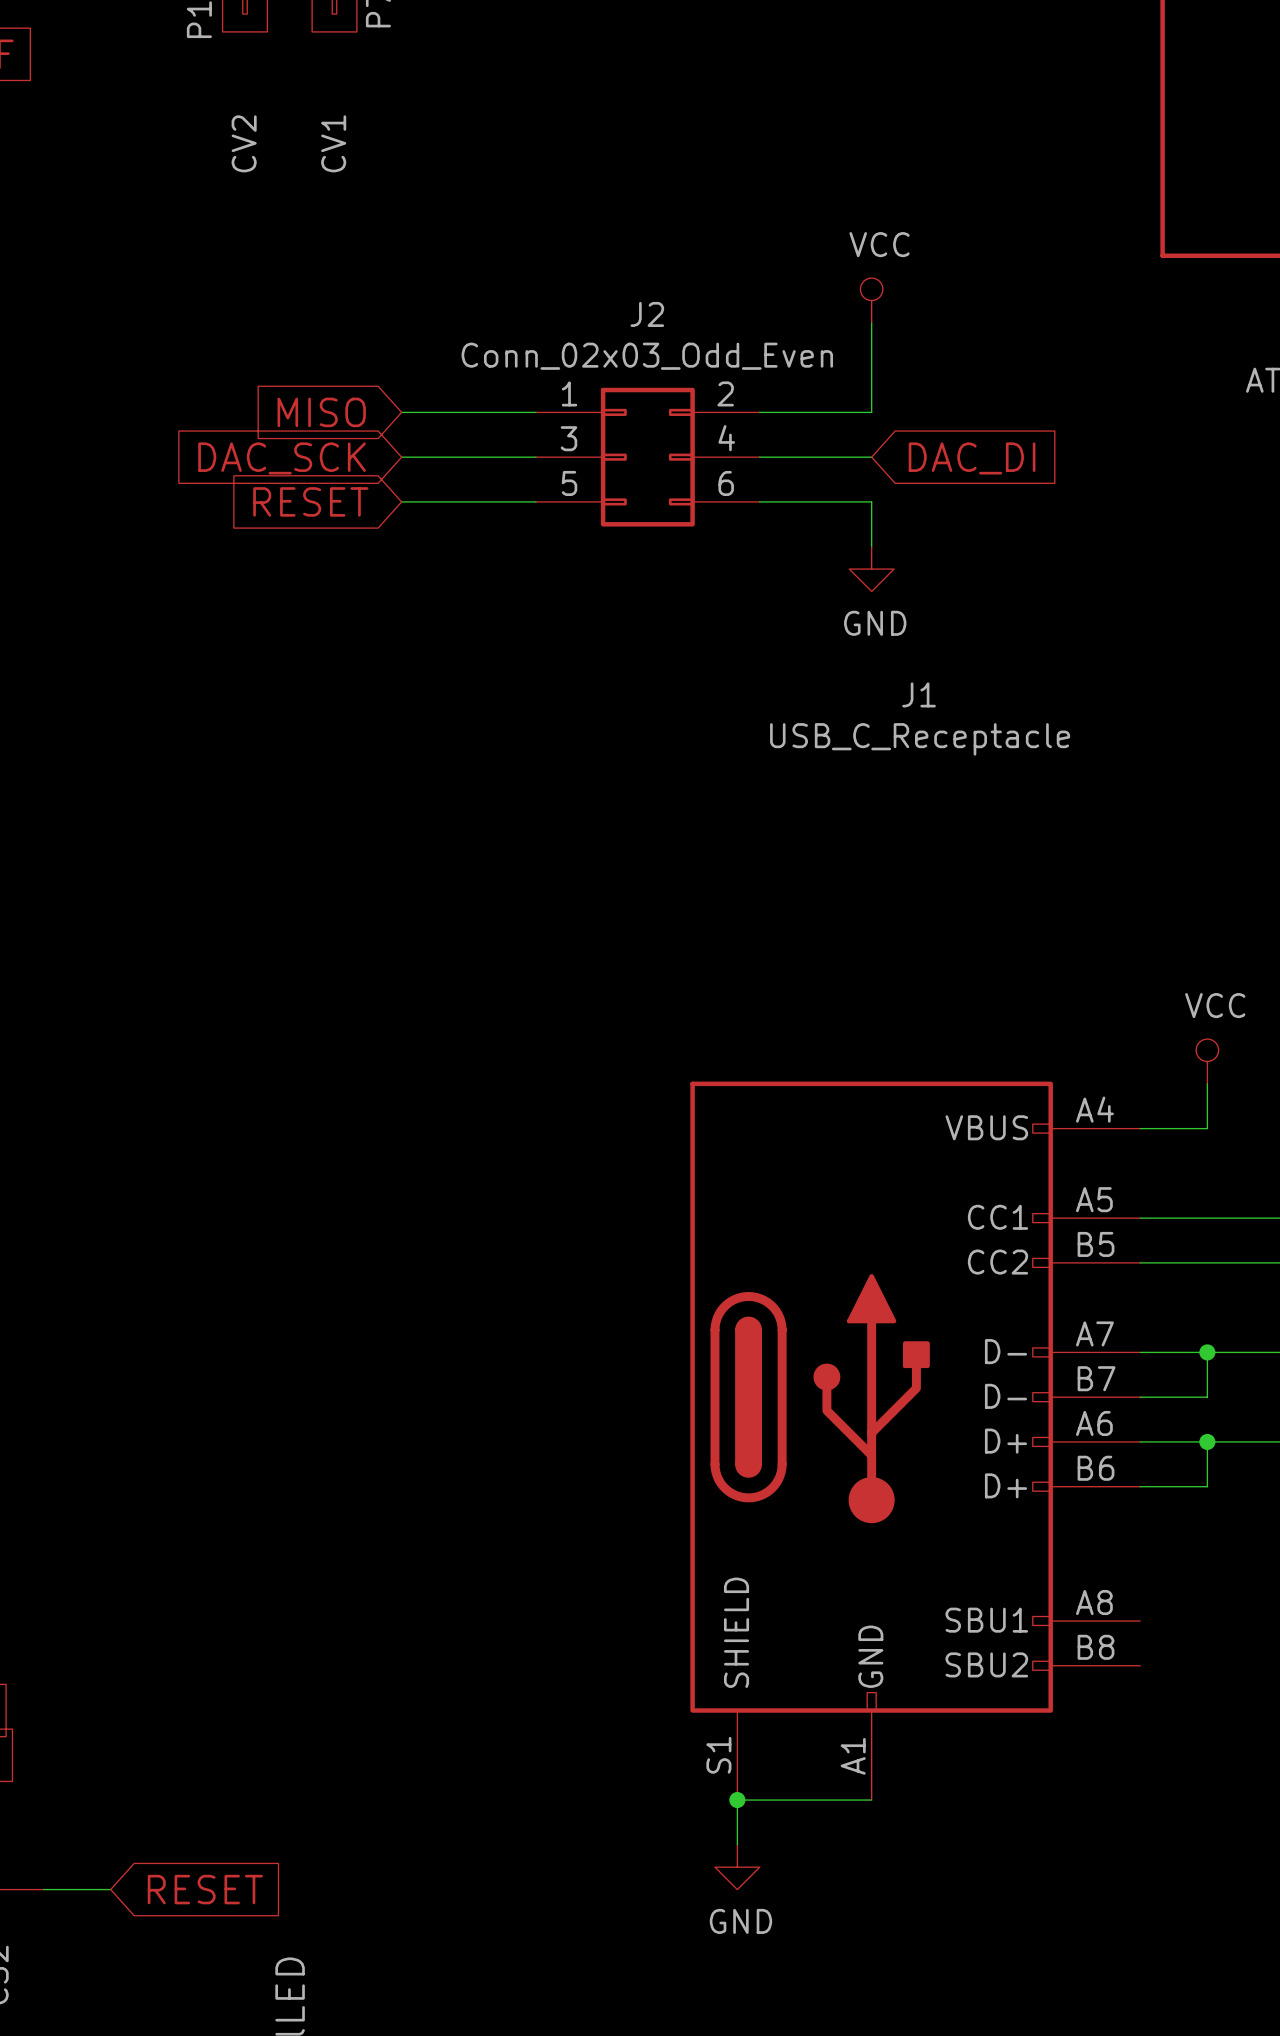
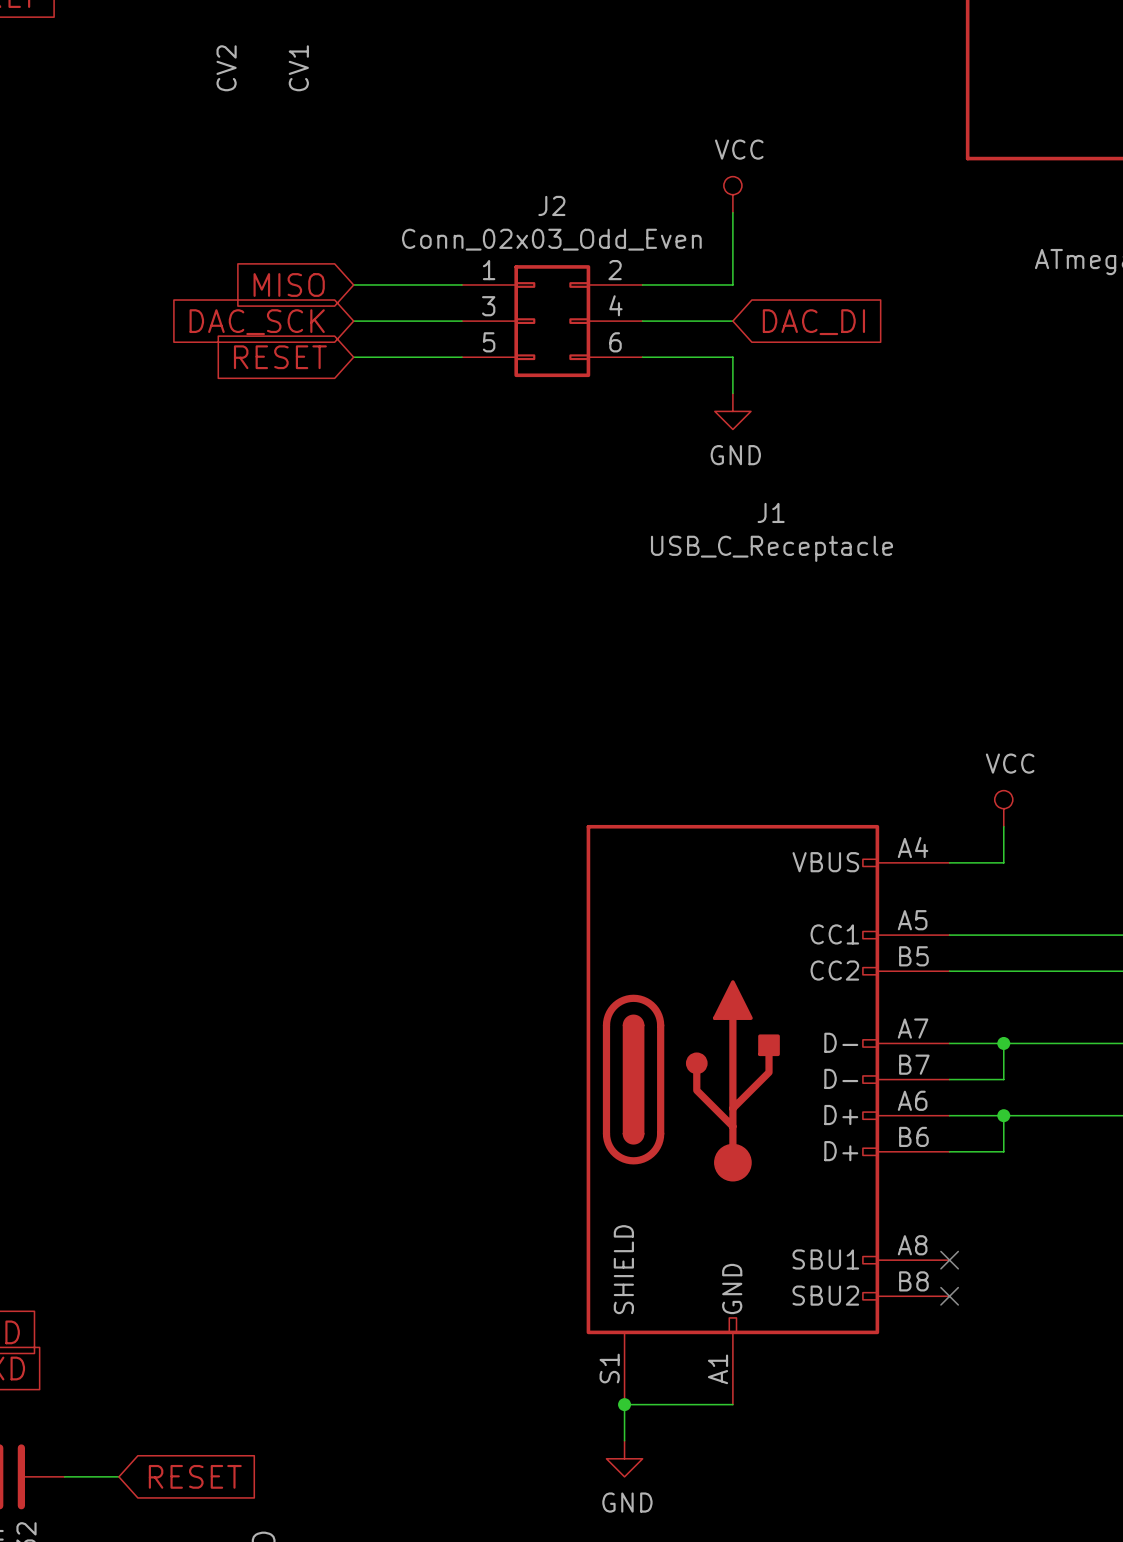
no-connect mark: none -> (949, 1260)
no-connect mark: none -> (949, 1296)

